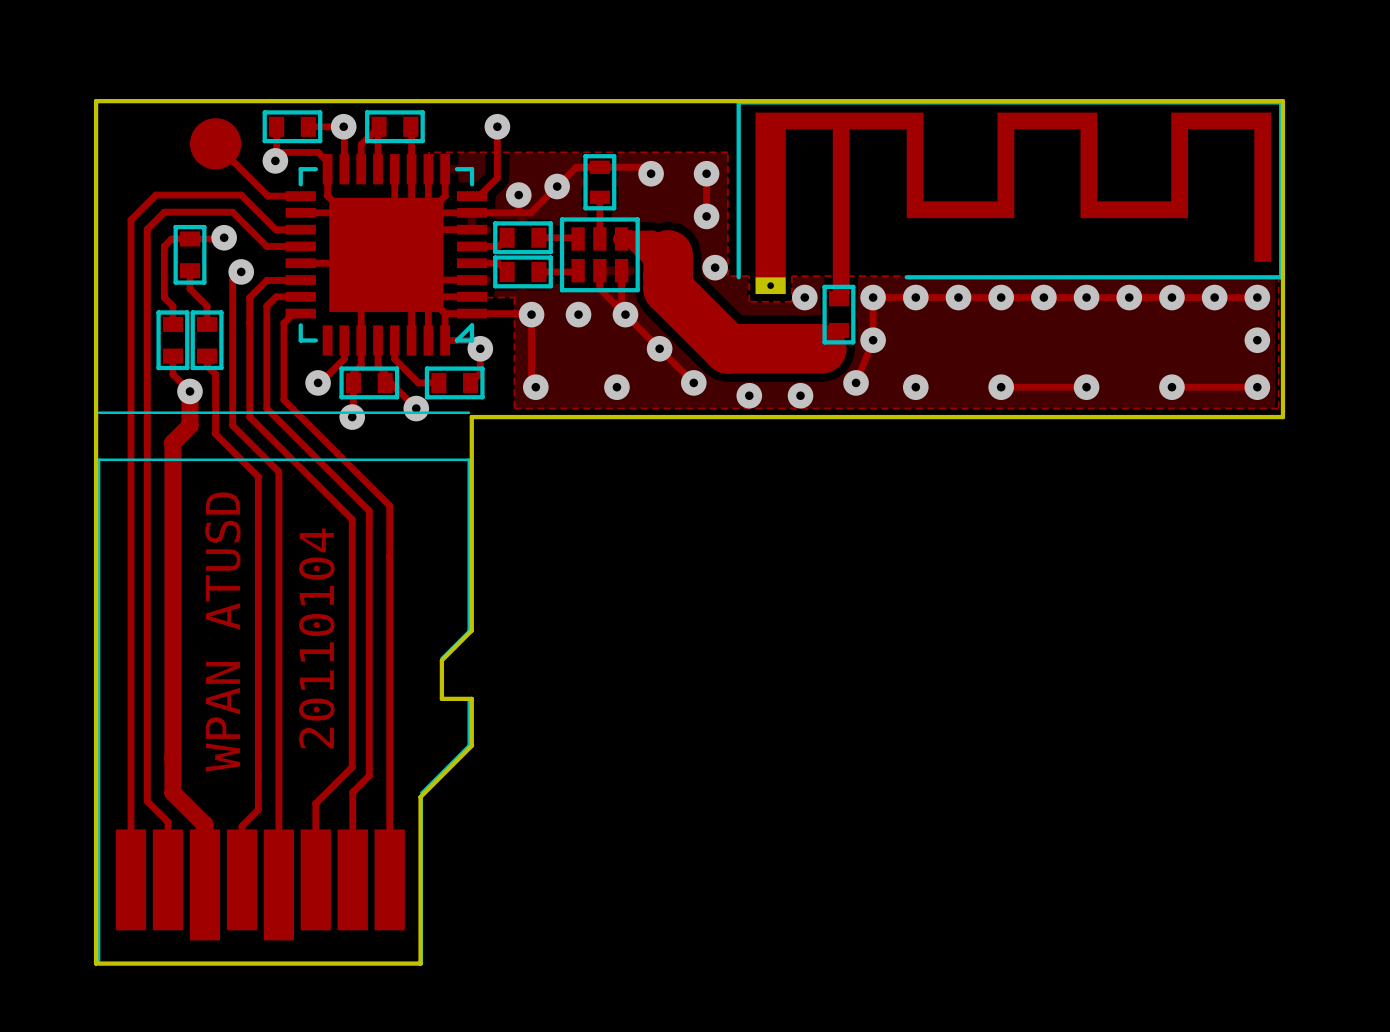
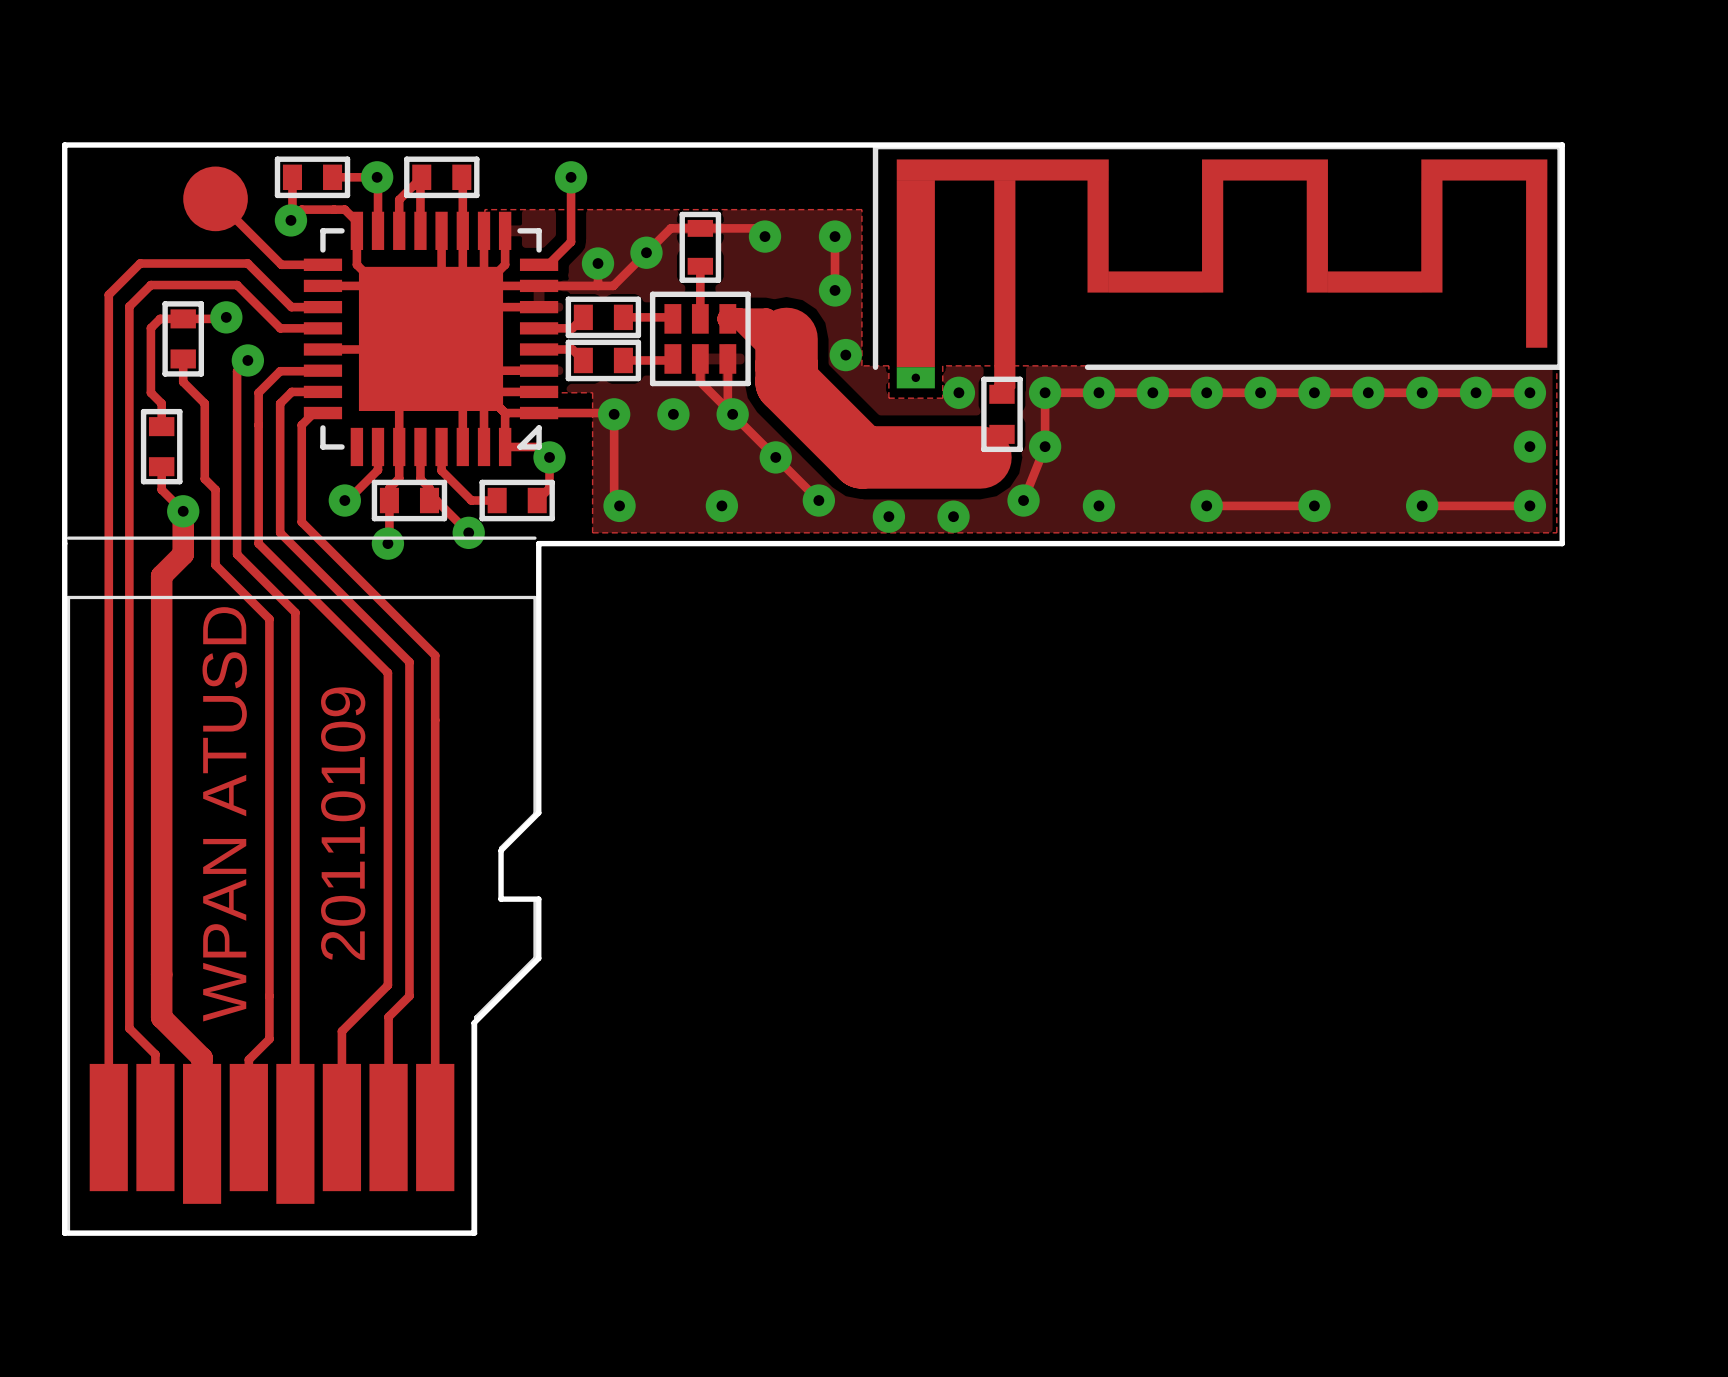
track: none -> (204, 426) (204, 466)
part: (207, 340) -> none
text: 20110104 (316, 638) -> 20110109 (343, 823)

